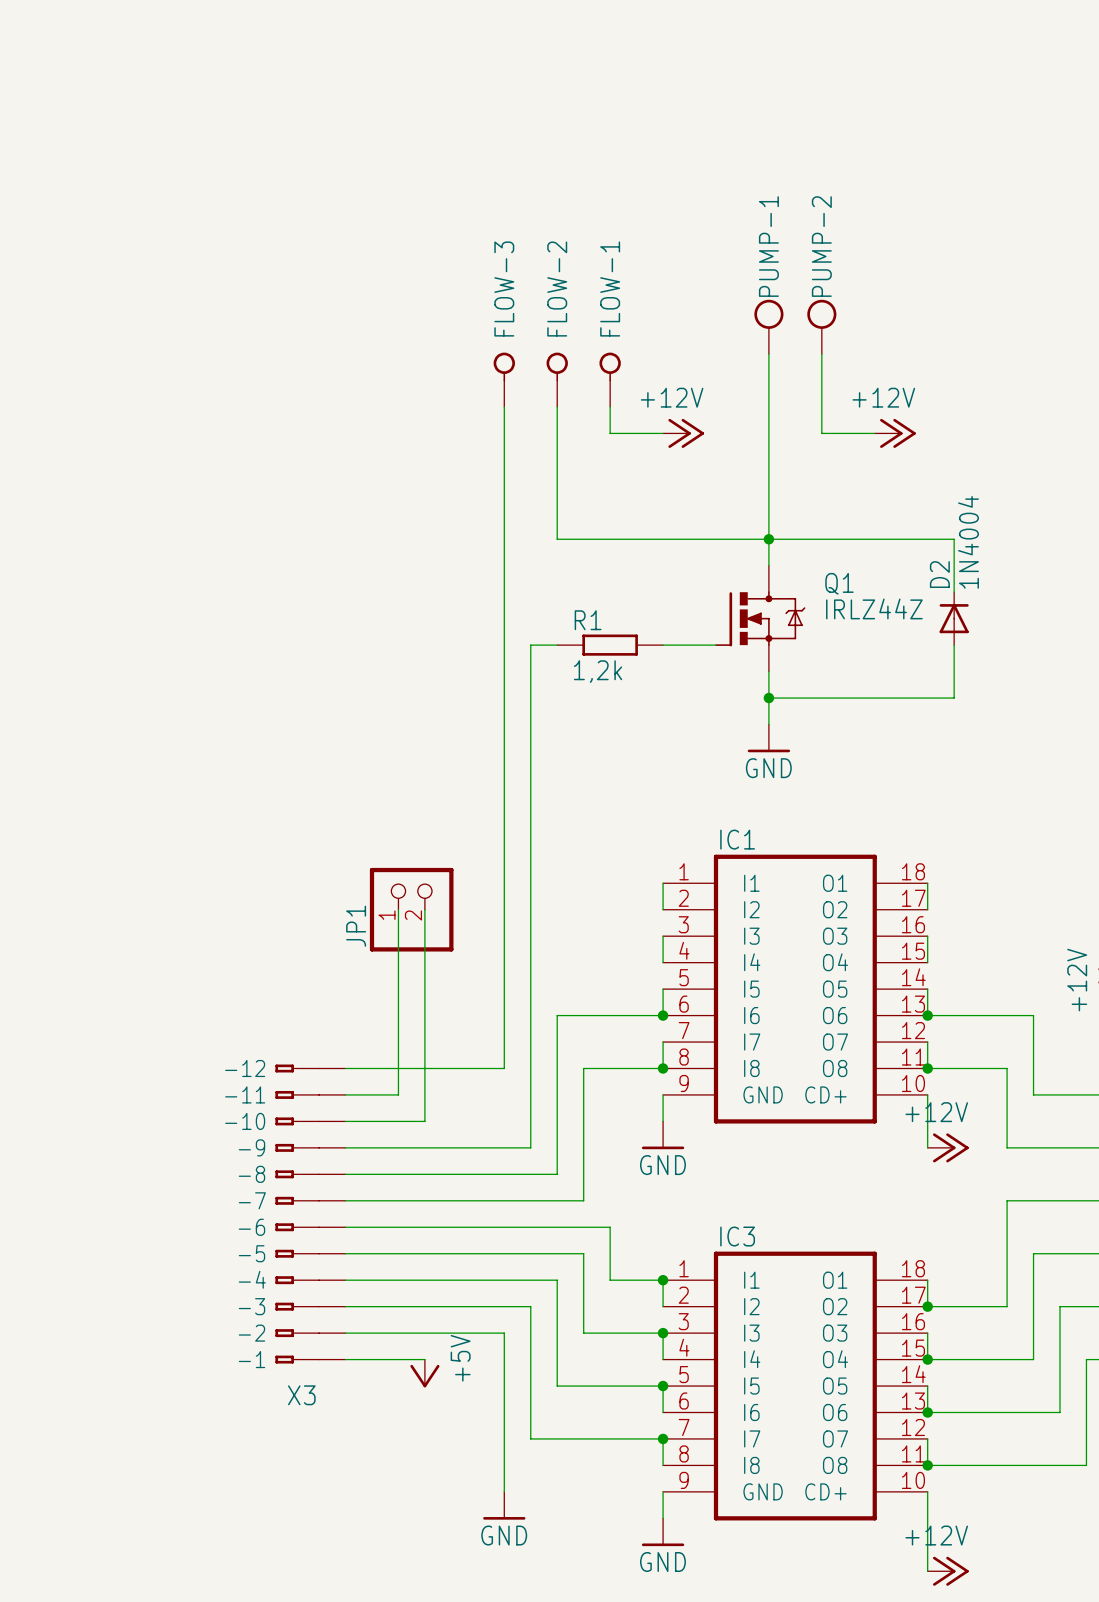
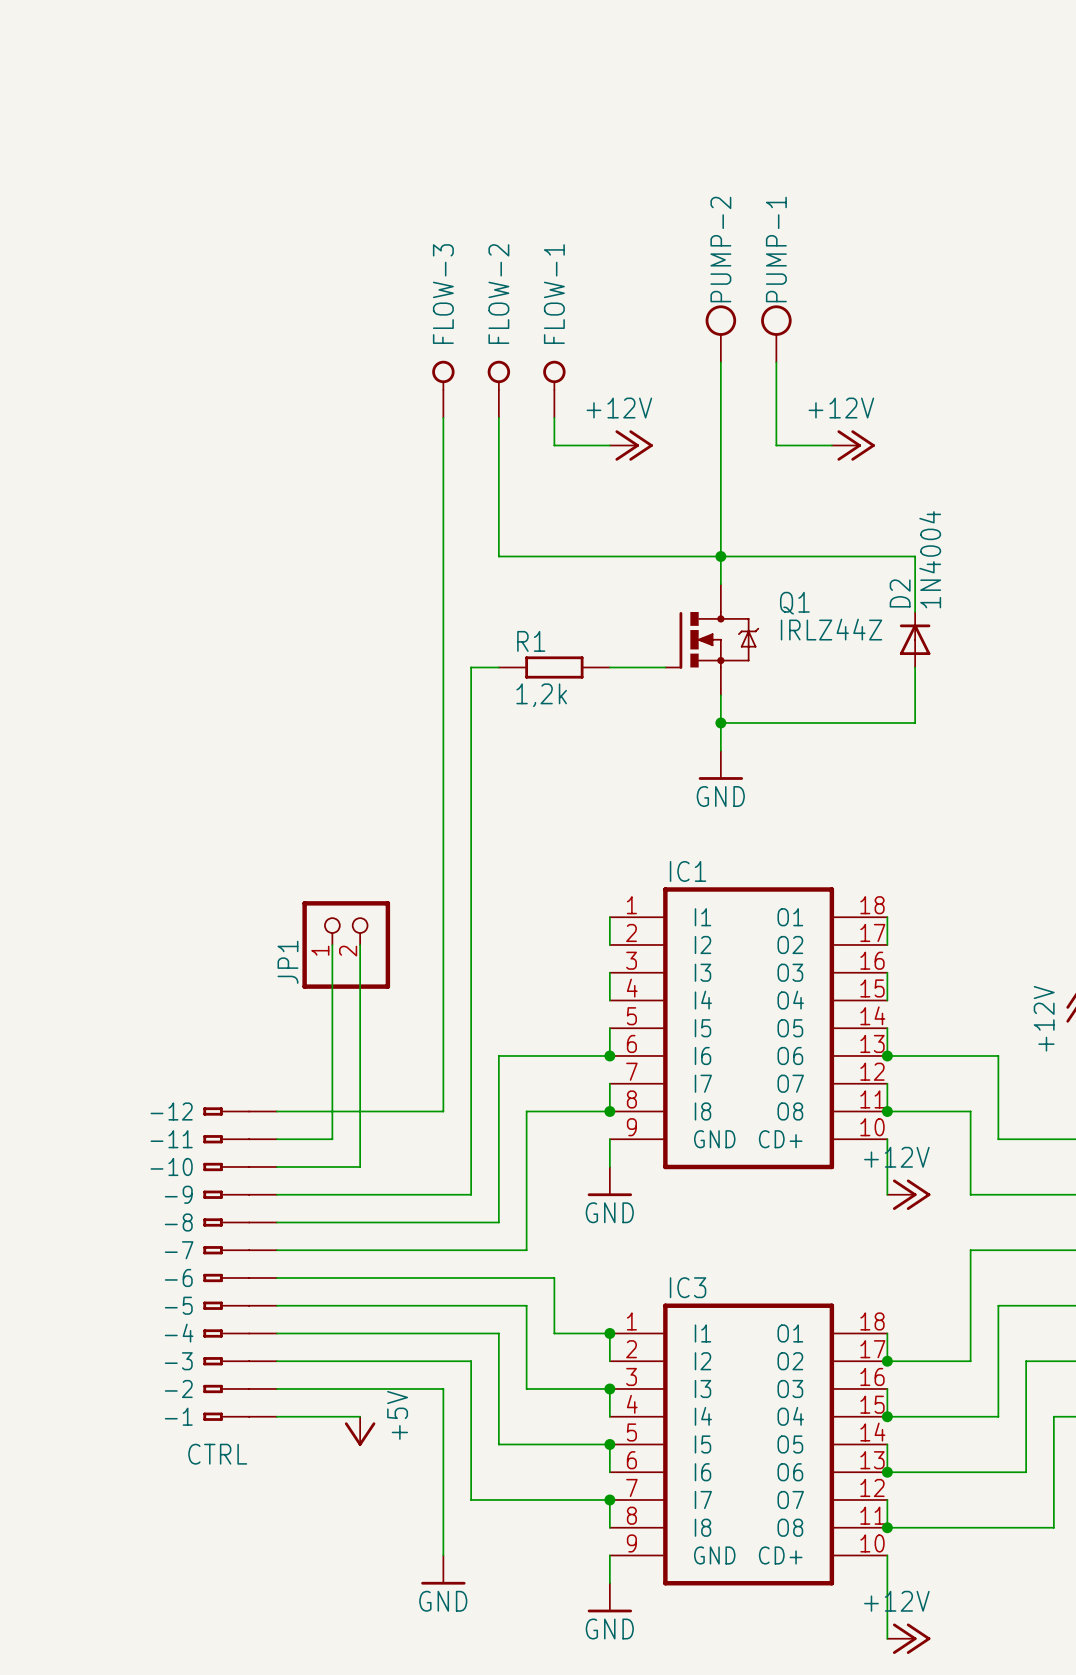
PUMP-1 name: PUMP-1 (768, 246) -> PUMP-2 (720, 249)
PUMP-2 name: PUMP-2 (821, 246) -> PUMP-1 (776, 249)
X3 name: X3 (301, 1395) -> CTRL (217, 1454)

